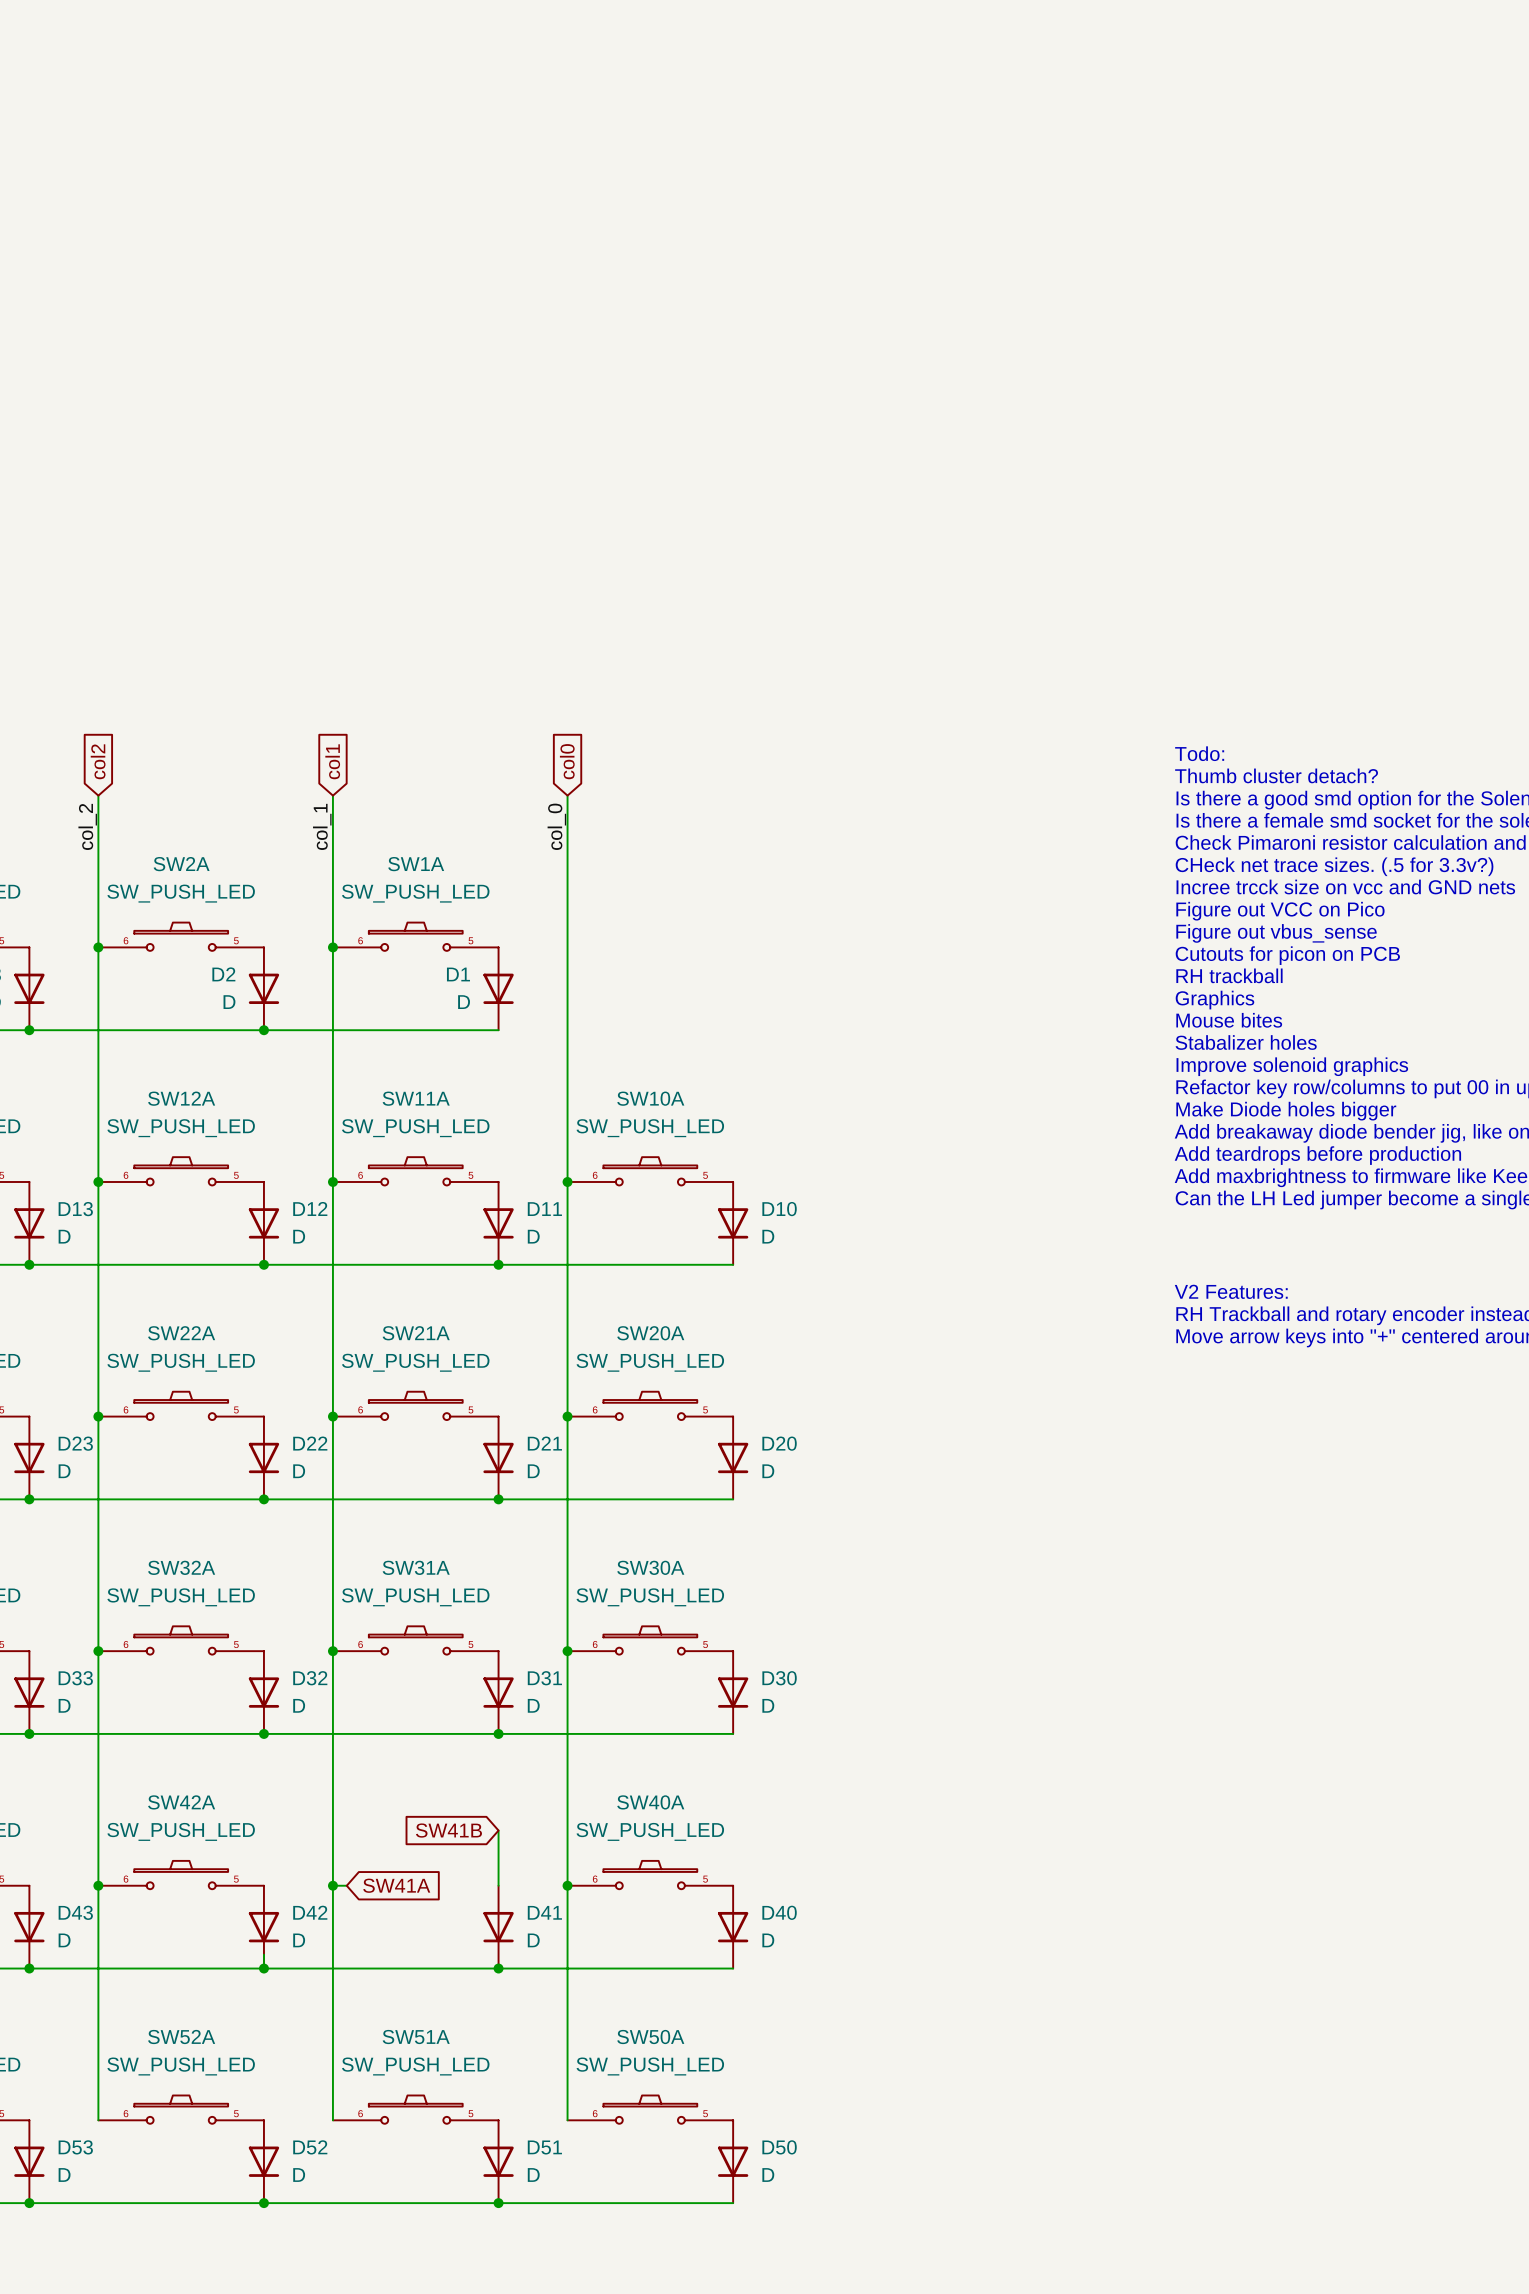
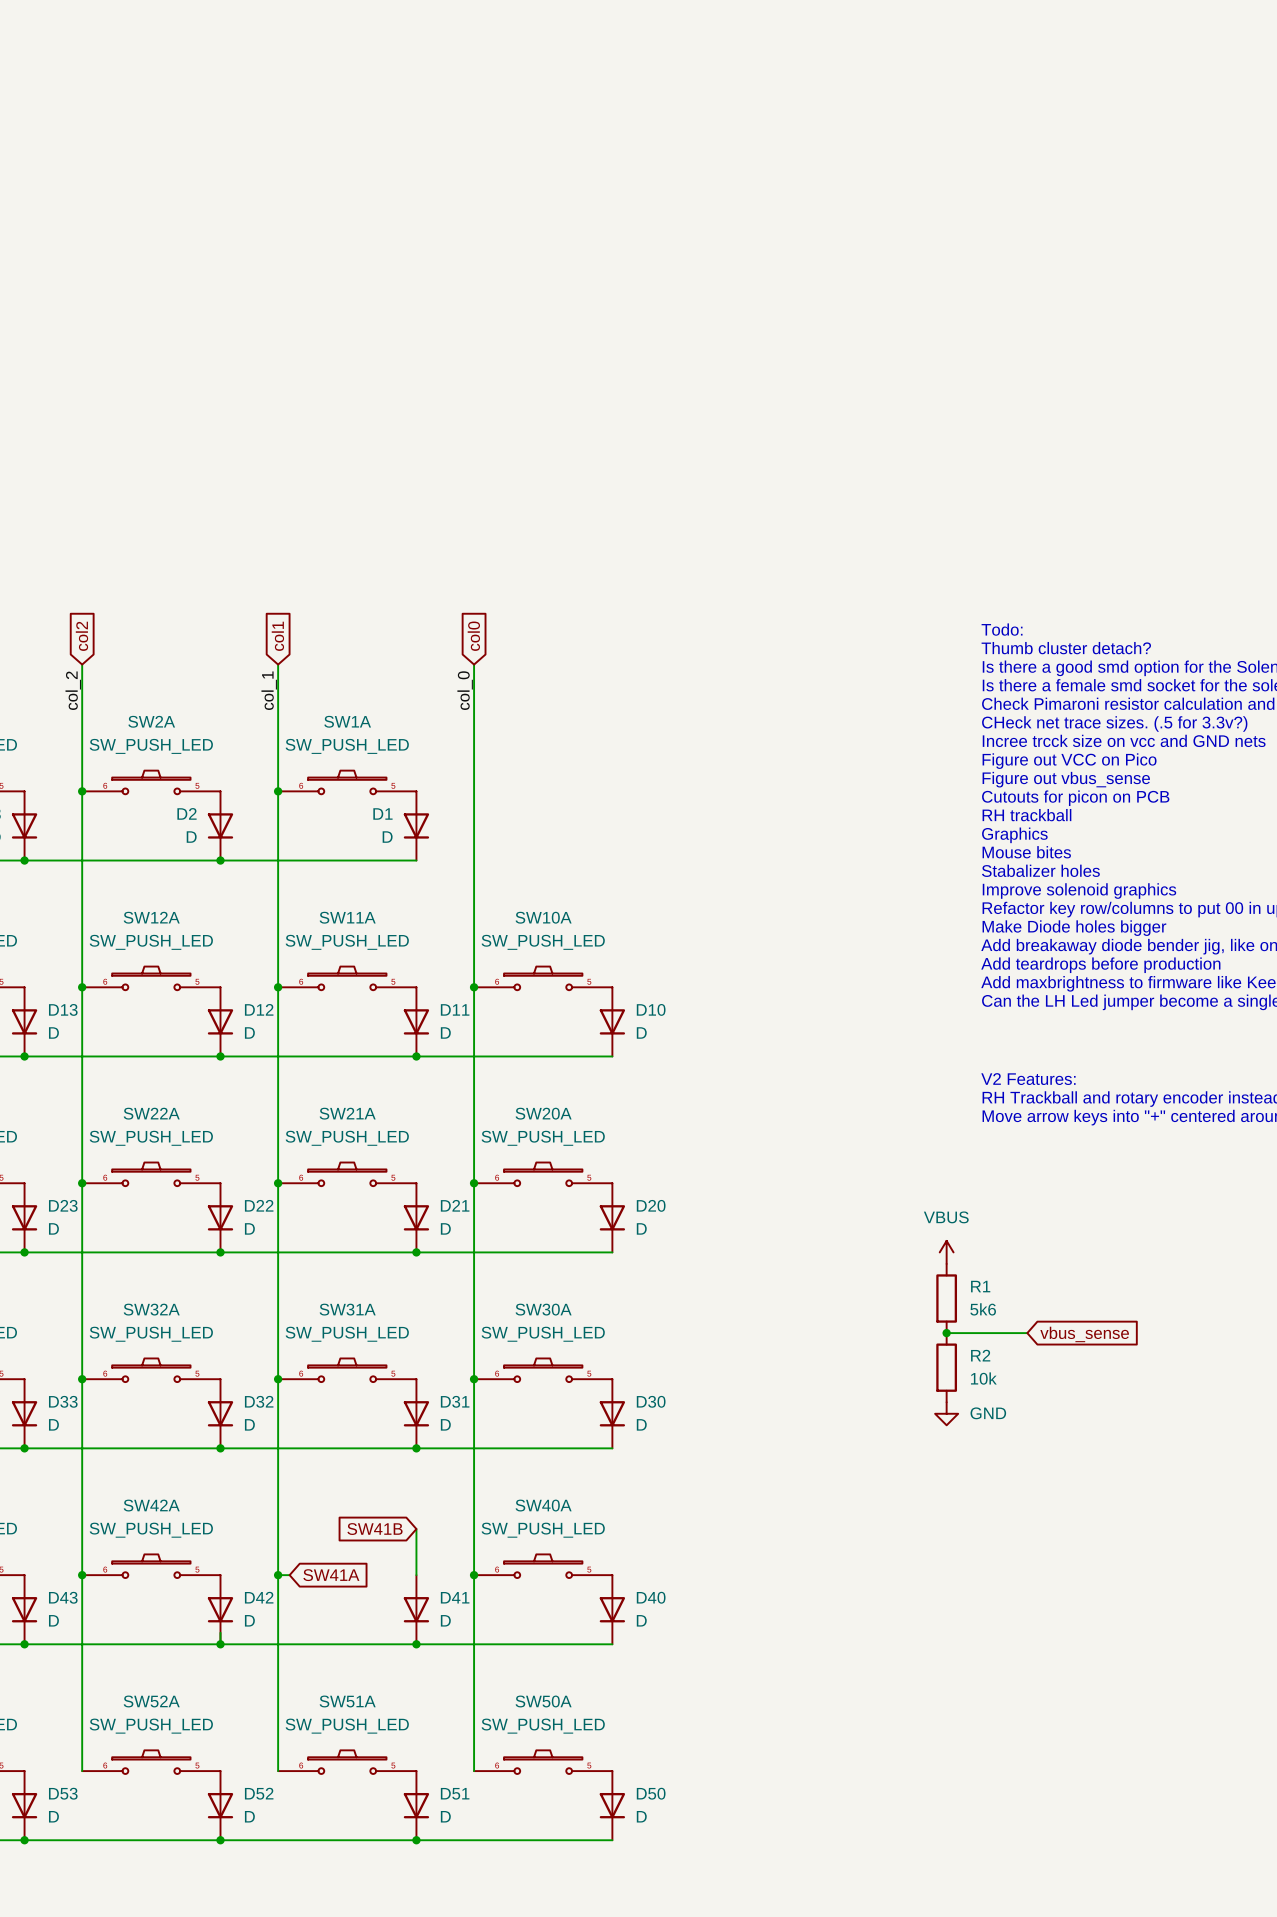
power symbol: none -> VBUS (946, 1252)
R1: none -> 5k6 (946, 1298)
wire: none -> (946, 1333) (1027, 1333)
junction: none -> (946, 1333)
global label: none -> vbus_sense (1084, 1334)
R2: none -> 10k (946, 1367)
power symbol: none -> GND (946, 1413)

